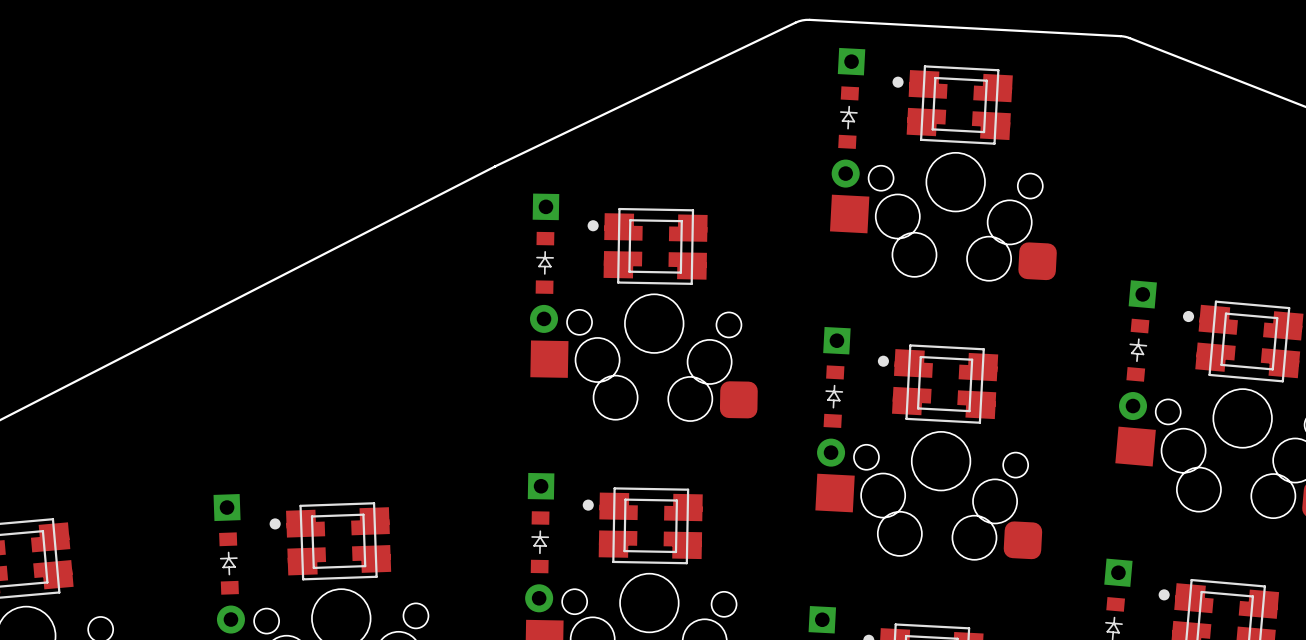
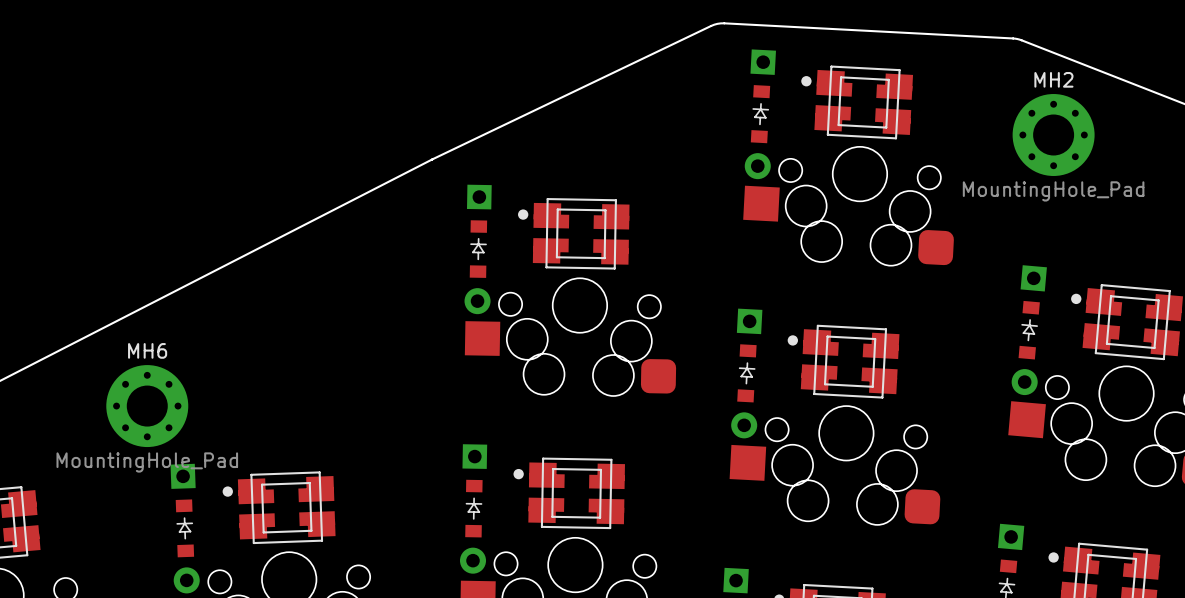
MH2: none -> MountingHole_Pad (1053, 135)
MH6: none -> MountingHole_Pad (147, 406)

